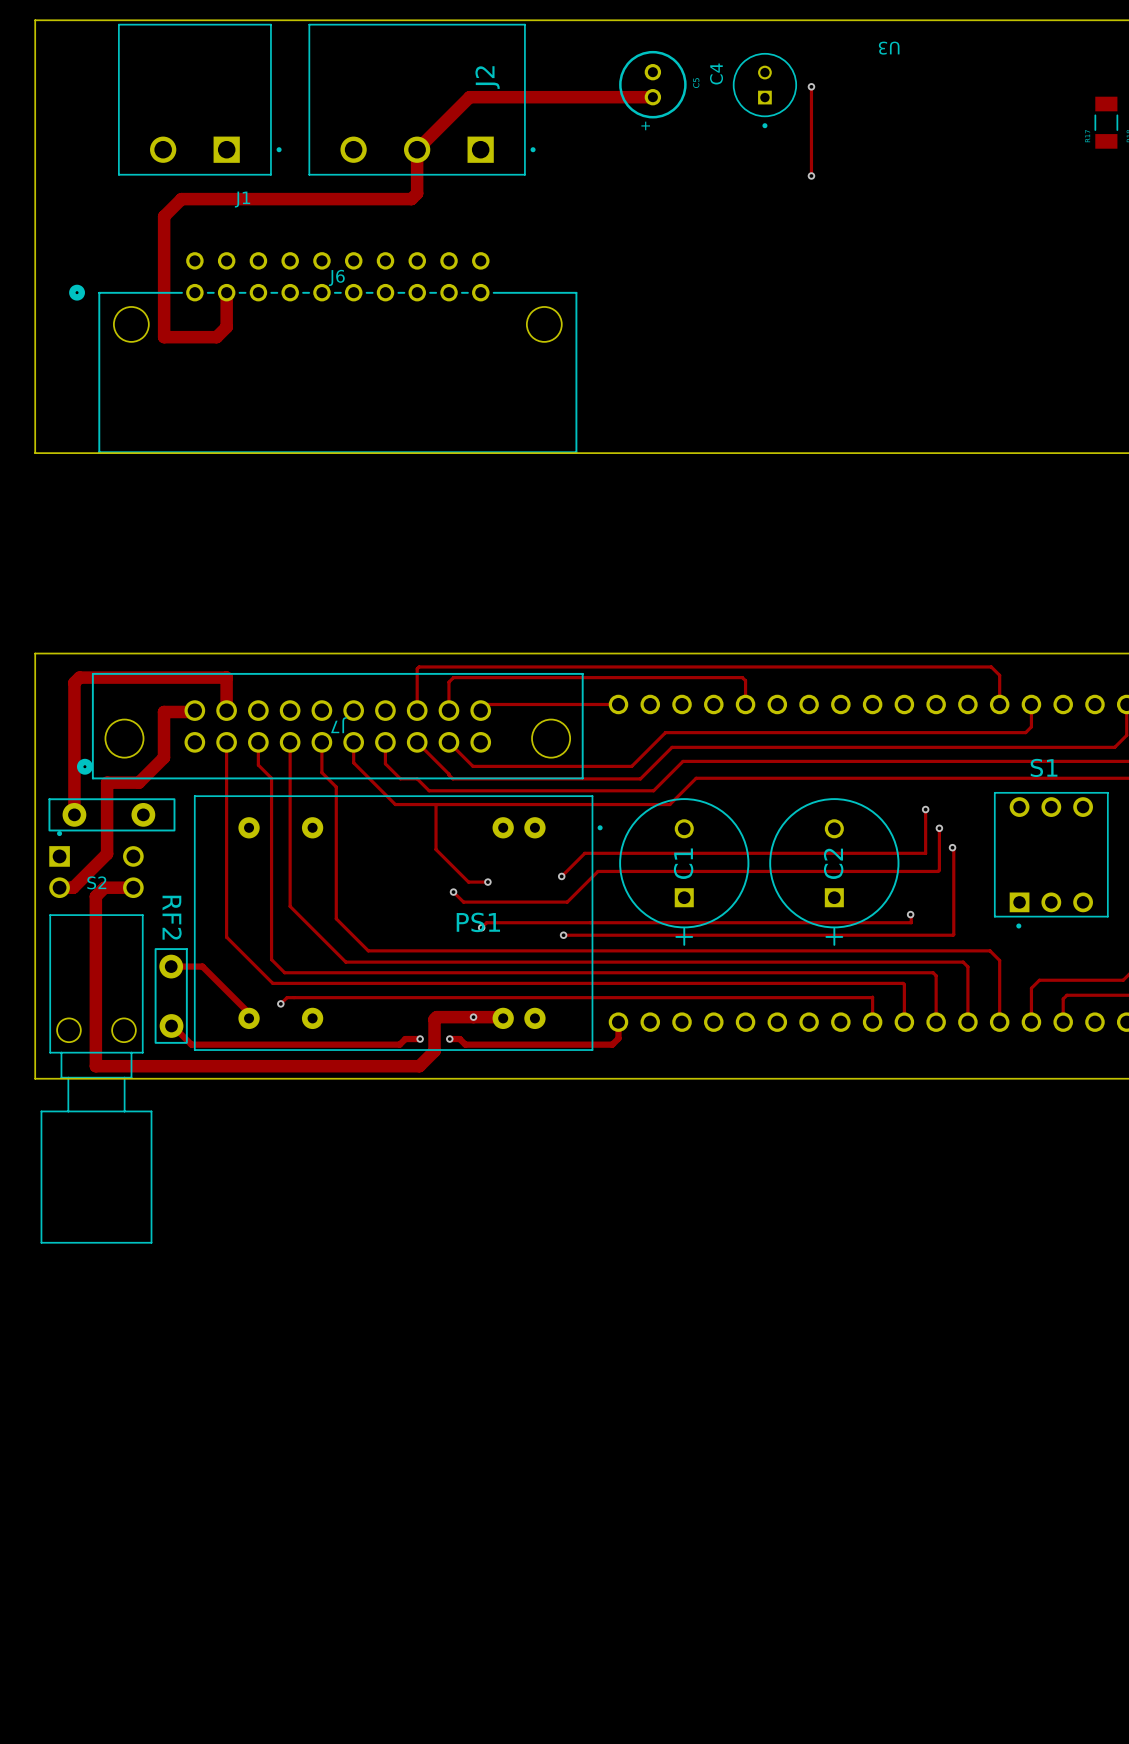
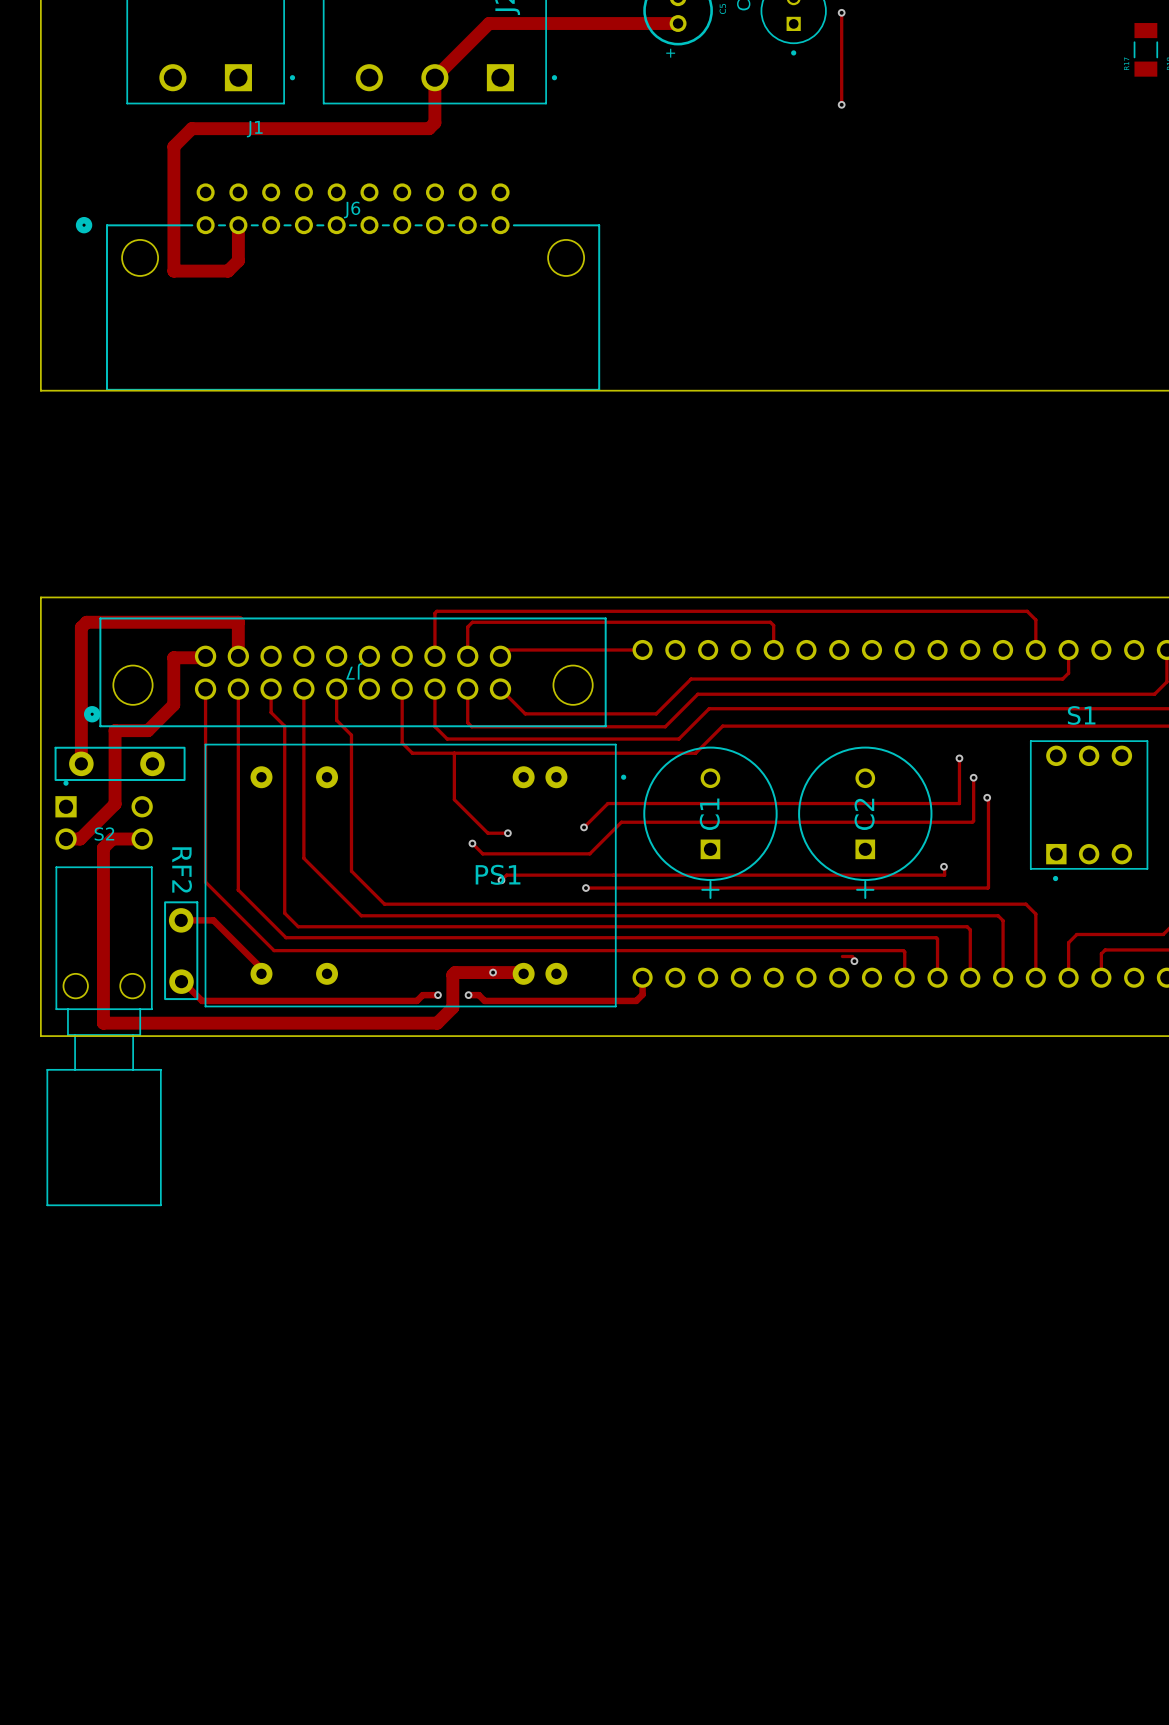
track: (353, 742) (353, 762) (385, 794) -> none
track: (417, 742) (448, 774) -> (467, 689) (467, 721)
track: none -> (434, 689) (434, 726)
track: (448, 742) (473, 766) (504, 766) -> (500, 689) (525, 713)
track: (385, 763) (400, 778) (417, 778) -> (402, 711) (402, 742)
track: (872, 997) (287, 997) (280, 1003) -> (904, 952) (274, 950) (205, 882) (205, 689)
track: none -> (842, 956) (852, 956) (854, 961)
via: (280, 1003) -> none
via: none -> (854, 961)

